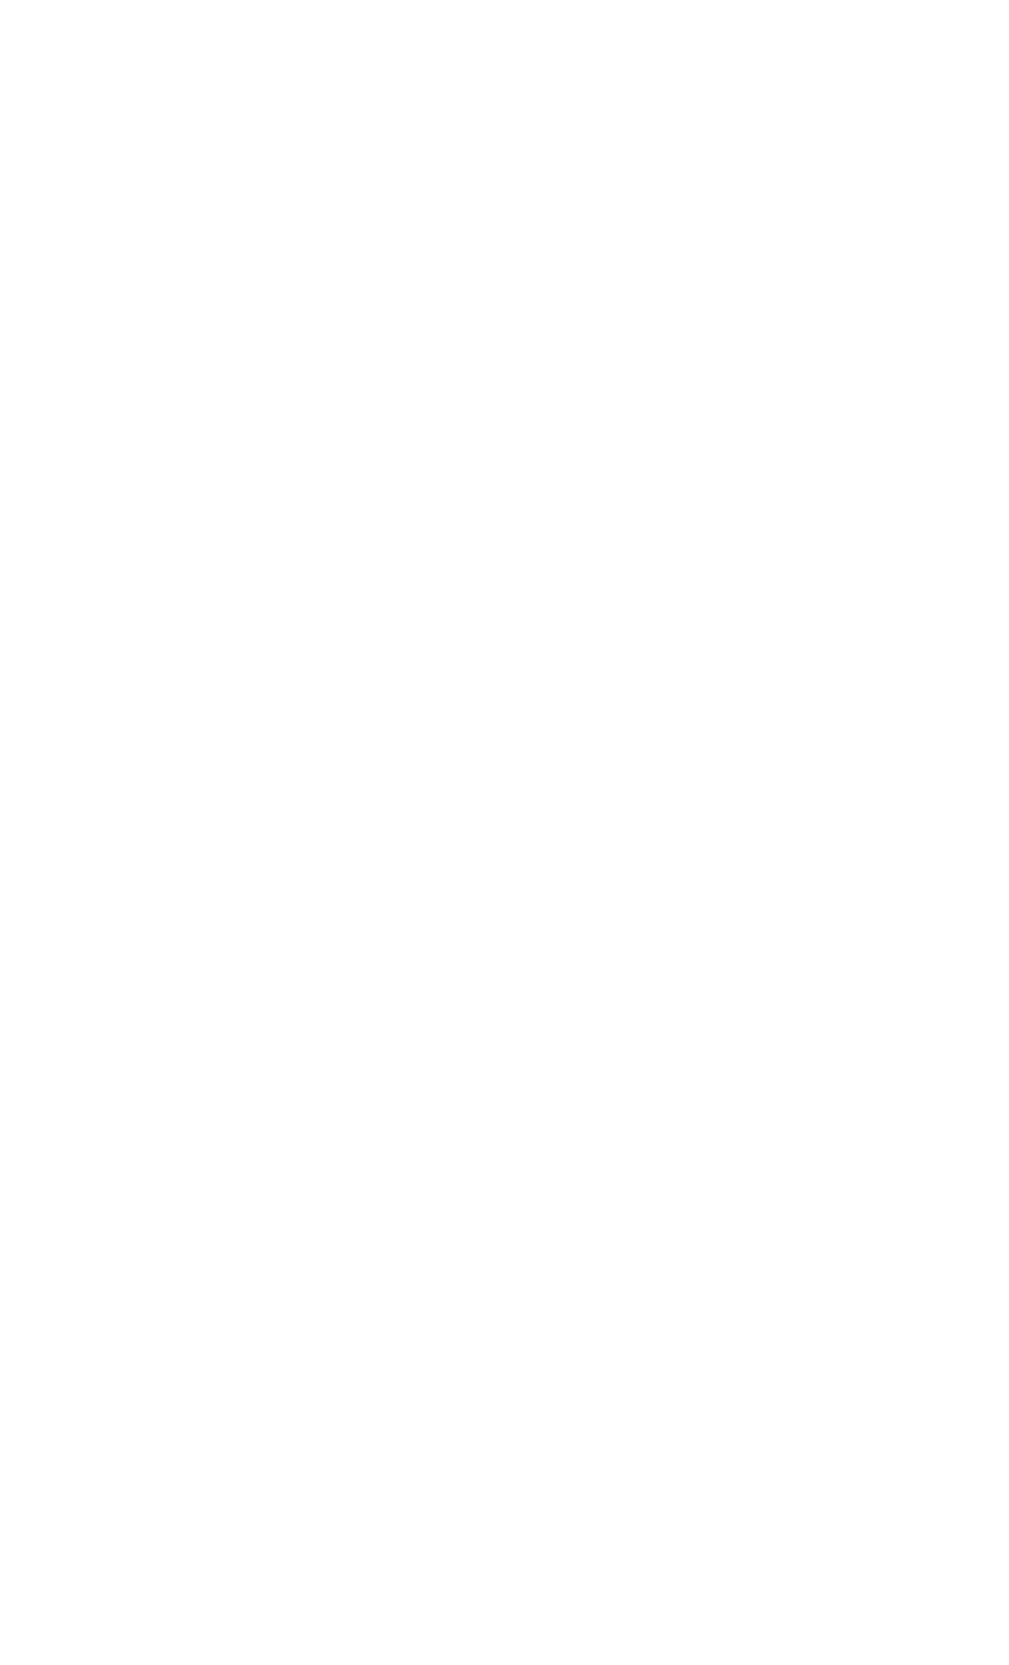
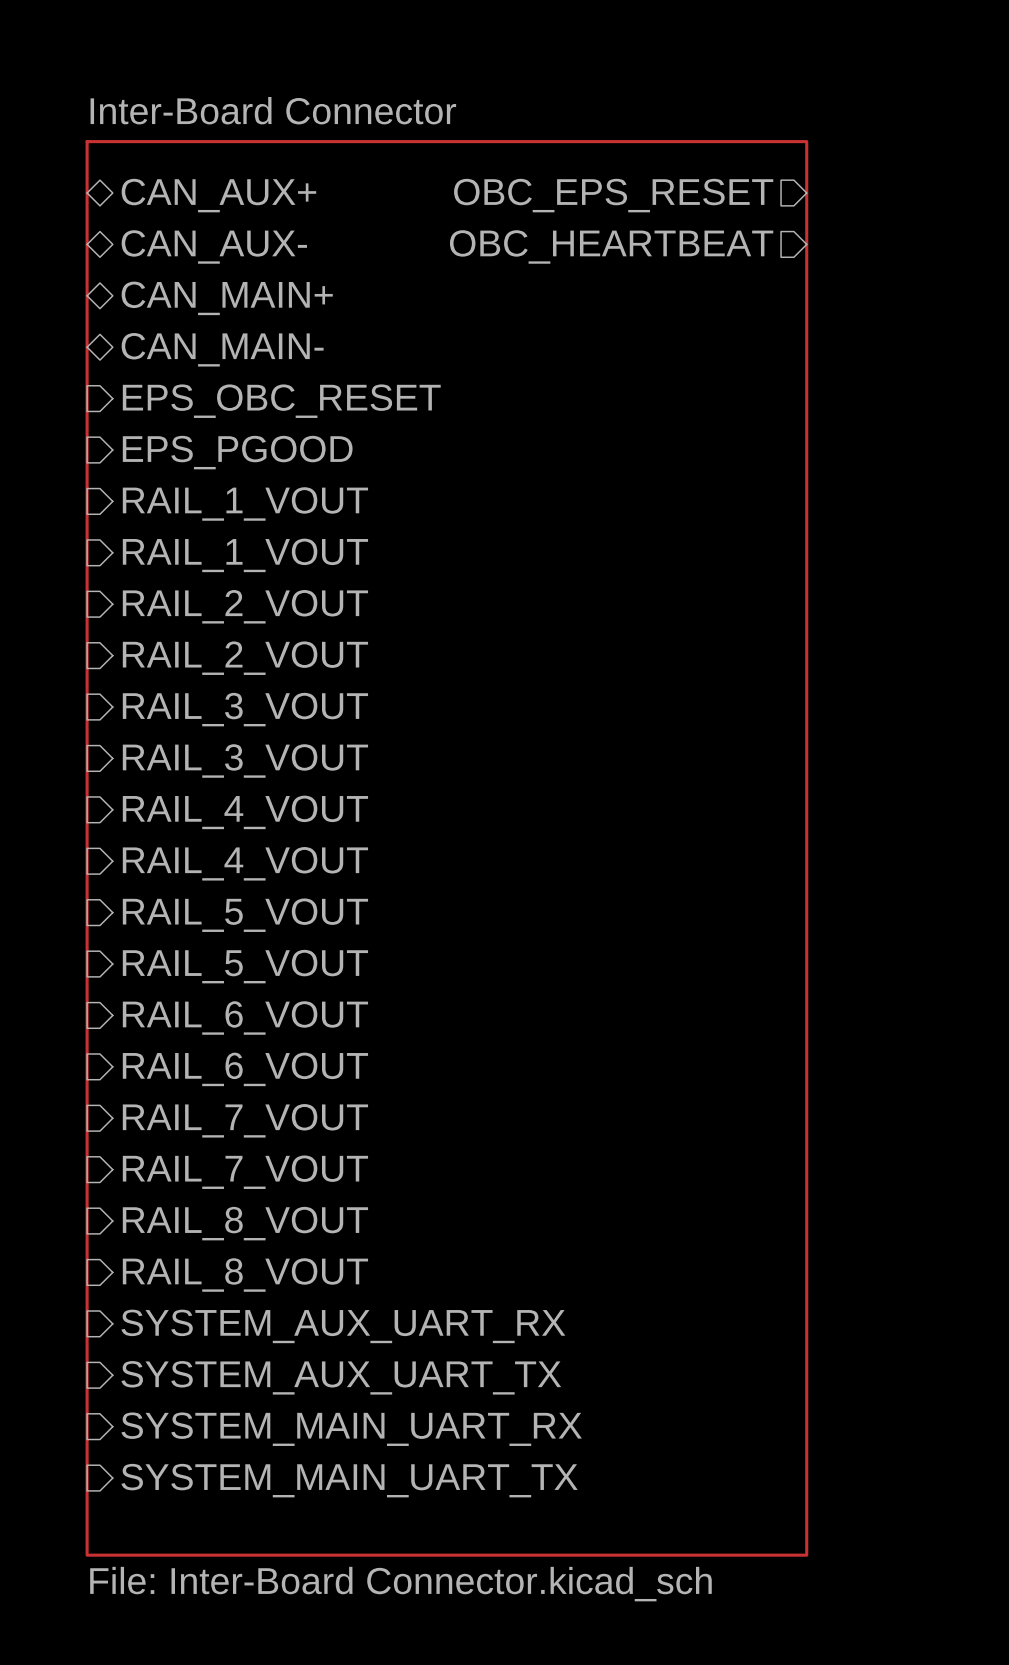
sheet pin: none -> CAN_AUX+ (218, 195)
sheet pin: none -> OBC_EPS_RESET (613, 195)
sheet pin: none -> CAN_AUX- (214, 246)
sheet pin: none -> OBC_HEARTBEAT (611, 246)
sheet pin: none -> CAN_MAIN+ (227, 298)
sheet pin: none -> CAN_MAIN- (222, 349)
sheet pin: none -> EPS_OBC_RESET (281, 401)
sheet pin: none -> EPS_PGOOD (237, 452)
sheet pin: none -> RAIL_1_VOUT (245, 503)
sheet pin: none -> RAIL_1_VOUT (245, 555)
sheet pin: none -> RAIL_2_VOUT (245, 606)
sheet pin: none -> RAIL_2_VOUT (245, 658)
sheet pin: none -> RAIL_3_VOUT (245, 709)
sheet pin: none -> RAIL_3_VOUT (245, 760)
sheet pin: none -> RAIL_4_VOUT (245, 812)
sheet Inter-Board Connector: none -> File: Inter-Board Connector.kicad_sch (446, 848)
sheet pin: none -> RAIL_4_VOUT (245, 863)
sheet pin: none -> RAIL_5_VOUT (245, 915)
sheet pin: none -> RAIL_5_VOUT (245, 966)
sheet pin: none -> RAIL_6_VOUT (245, 1018)
sheet pin: none -> RAIL_6_VOUT (245, 1069)
sheet pin: none -> RAIL_7_VOUT (245, 1120)
sheet pin: none -> RAIL_7_VOUT (245, 1172)
sheet pin: none -> RAIL_8_VOUT (245, 1223)
sheet pin: none -> RAIL_8_VOUT (245, 1275)
sheet pin: none -> SYSTEM_AUX_UART_RX (343, 1326)
sheet pin: none -> SYSTEM_AUX_UART_TX (341, 1377)
sheet pin: none -> SYSTEM_MAIN_UART_RX (351, 1429)
sheet pin: none -> SYSTEM_MAIN_UART_TX (349, 1480)

